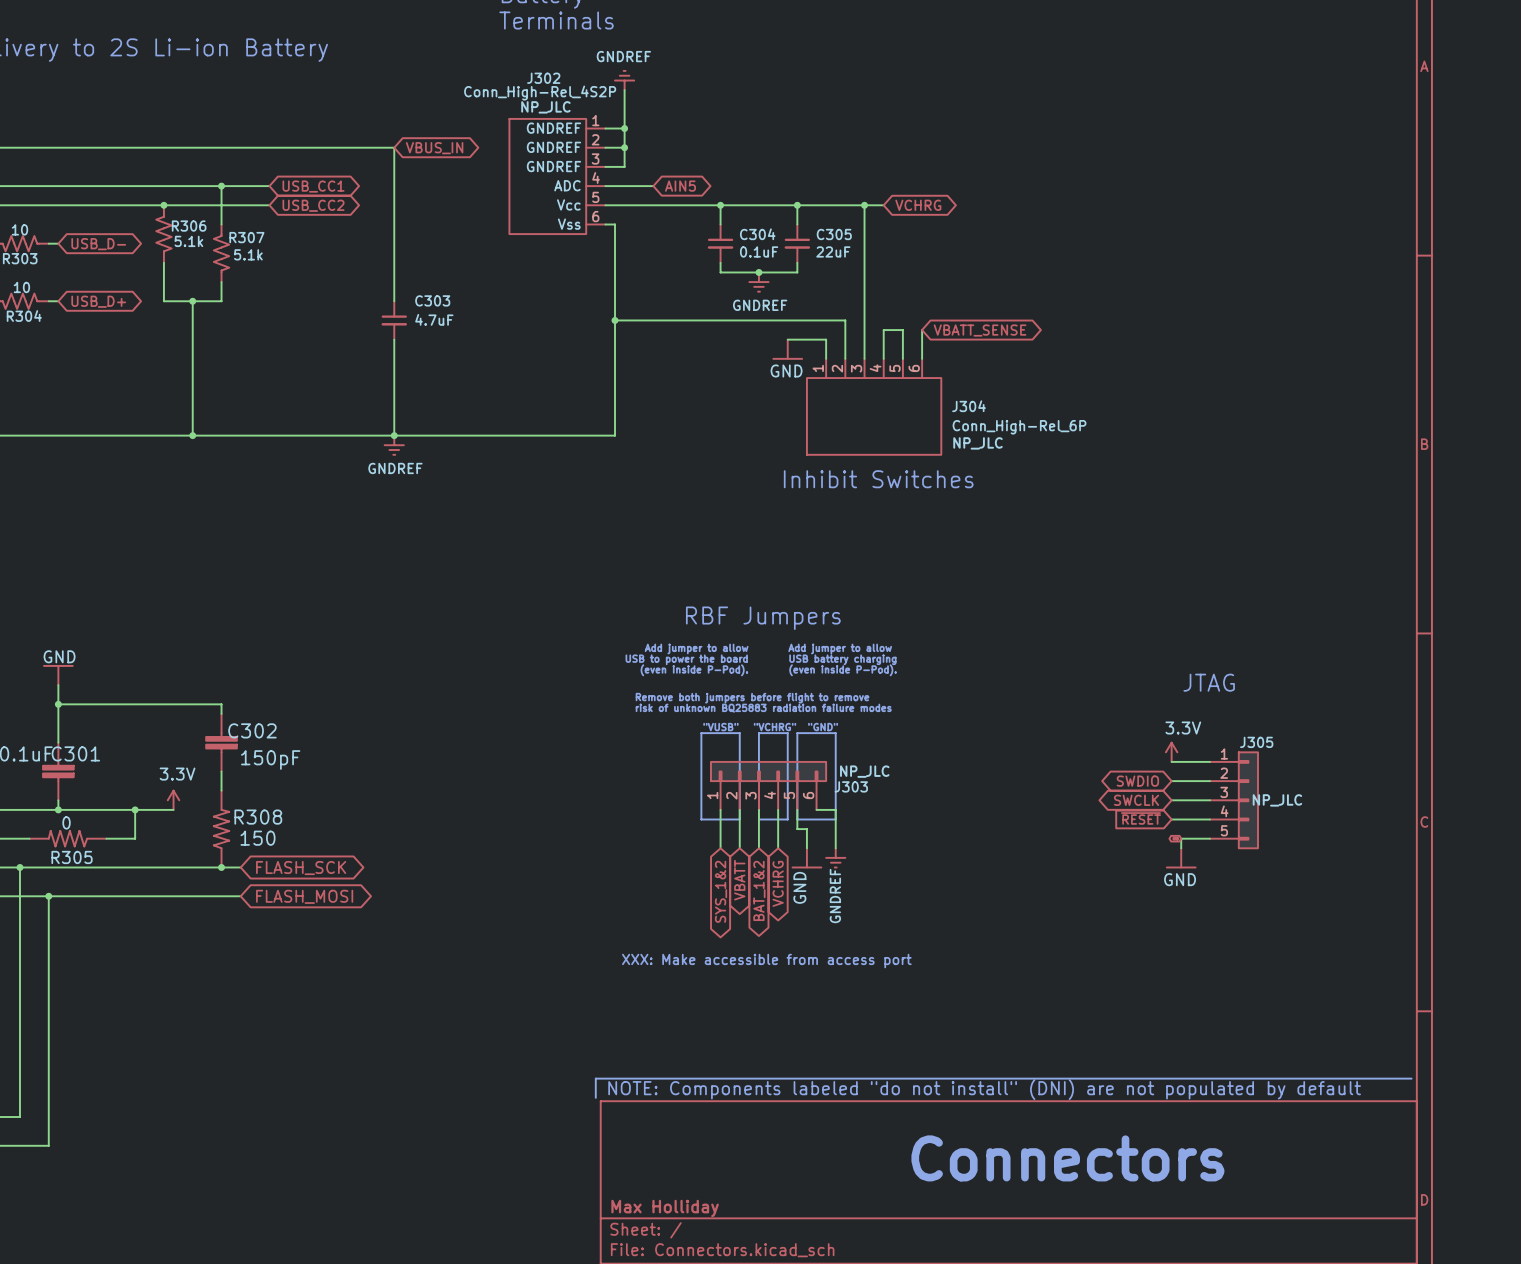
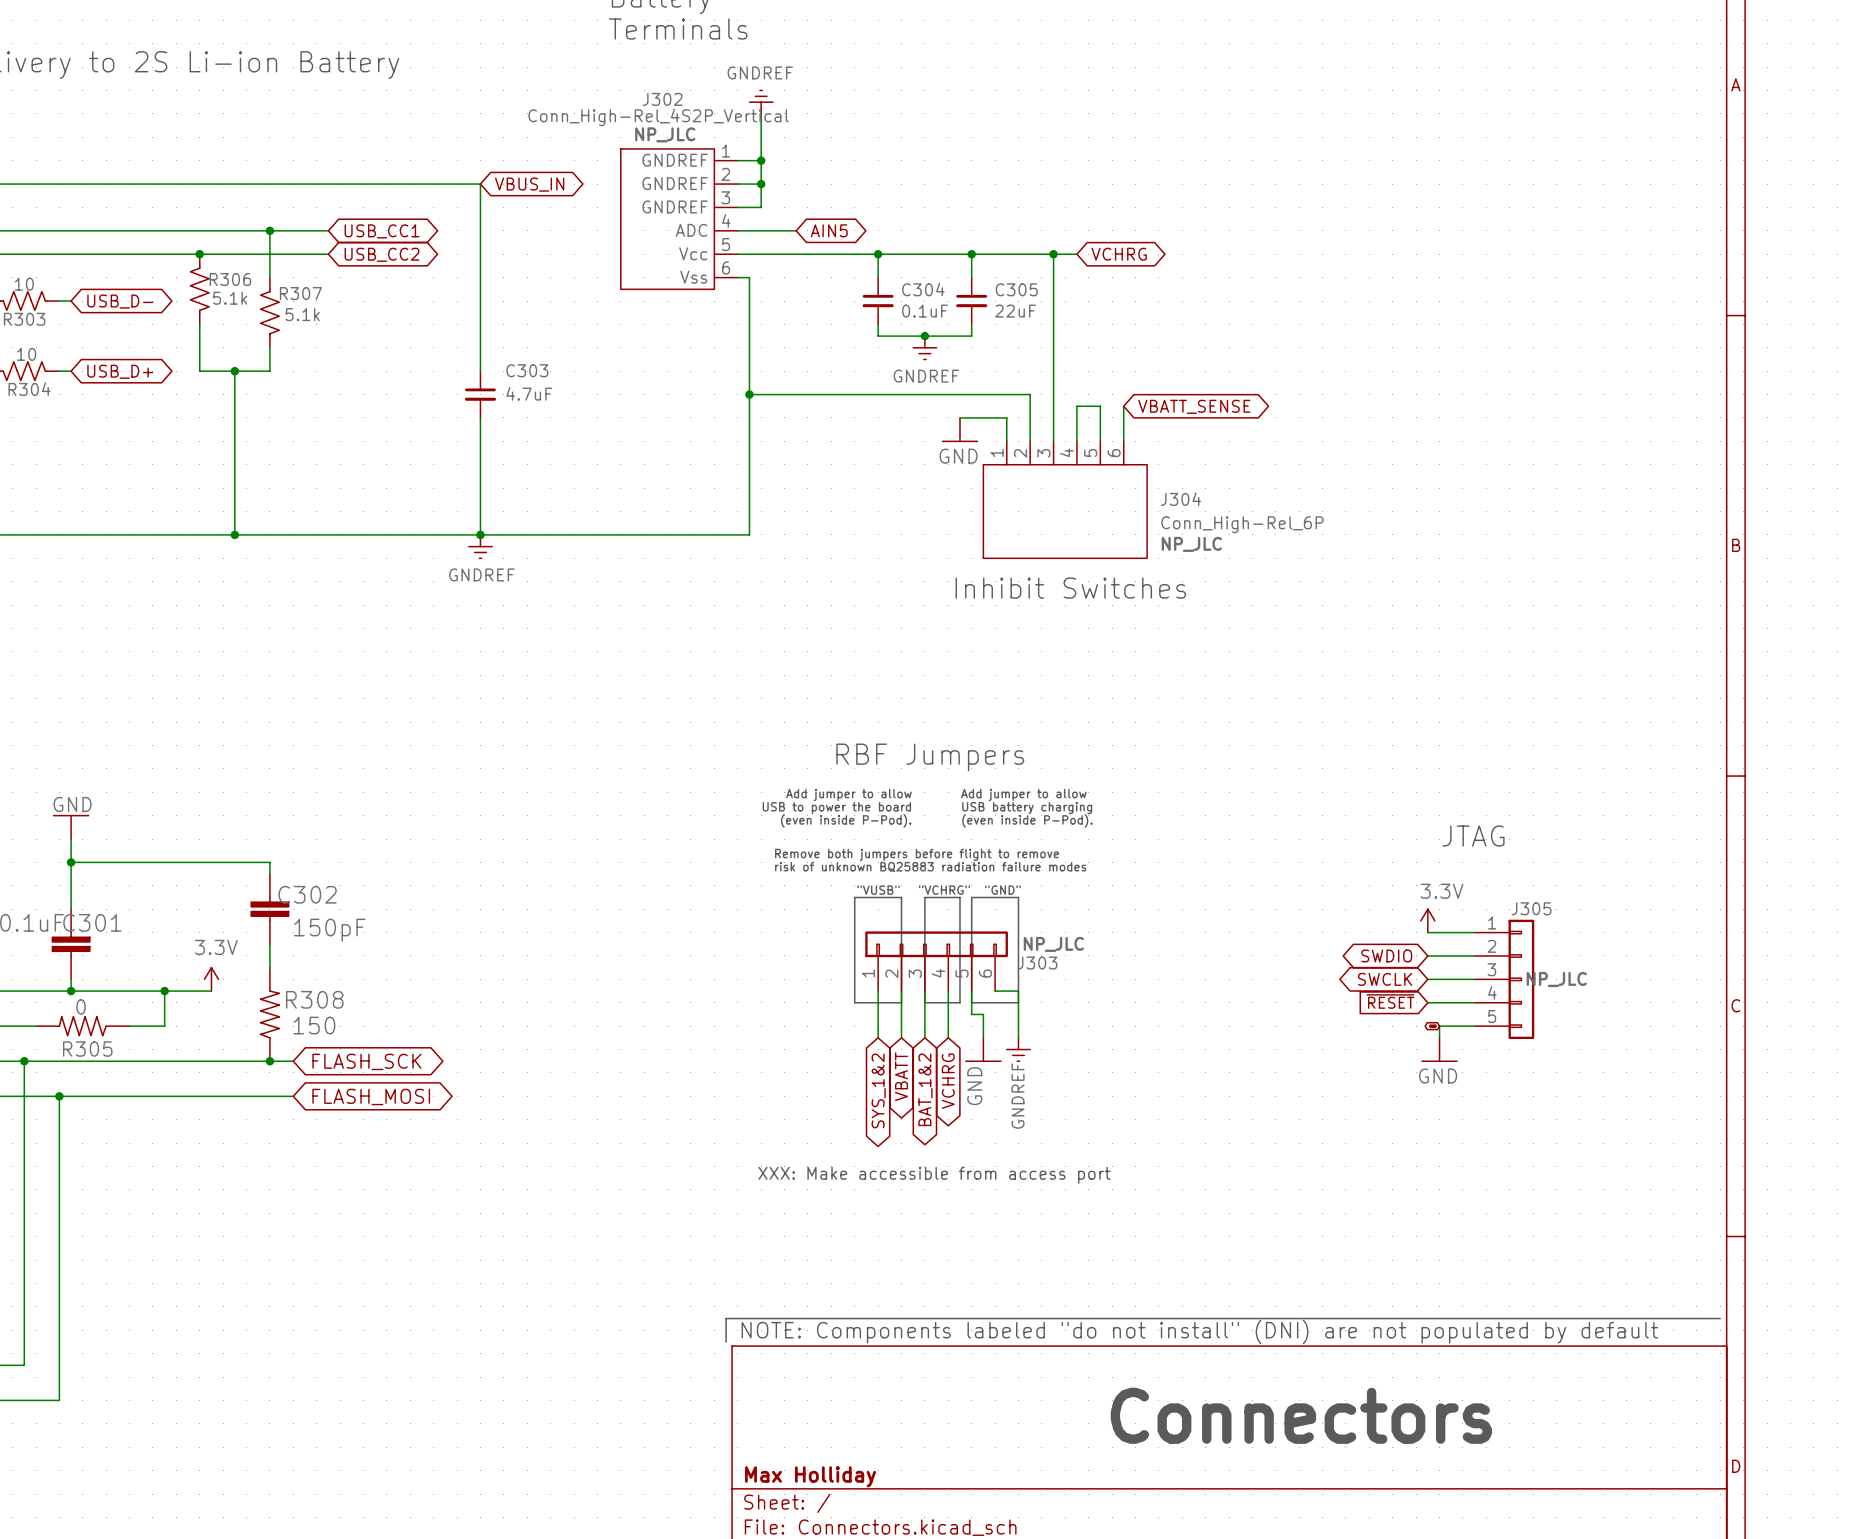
J302 value: Conn_High-Rel_4S2P (540, 93) -> Conn_High-Rel_4S2P_Vertical (658, 117)

